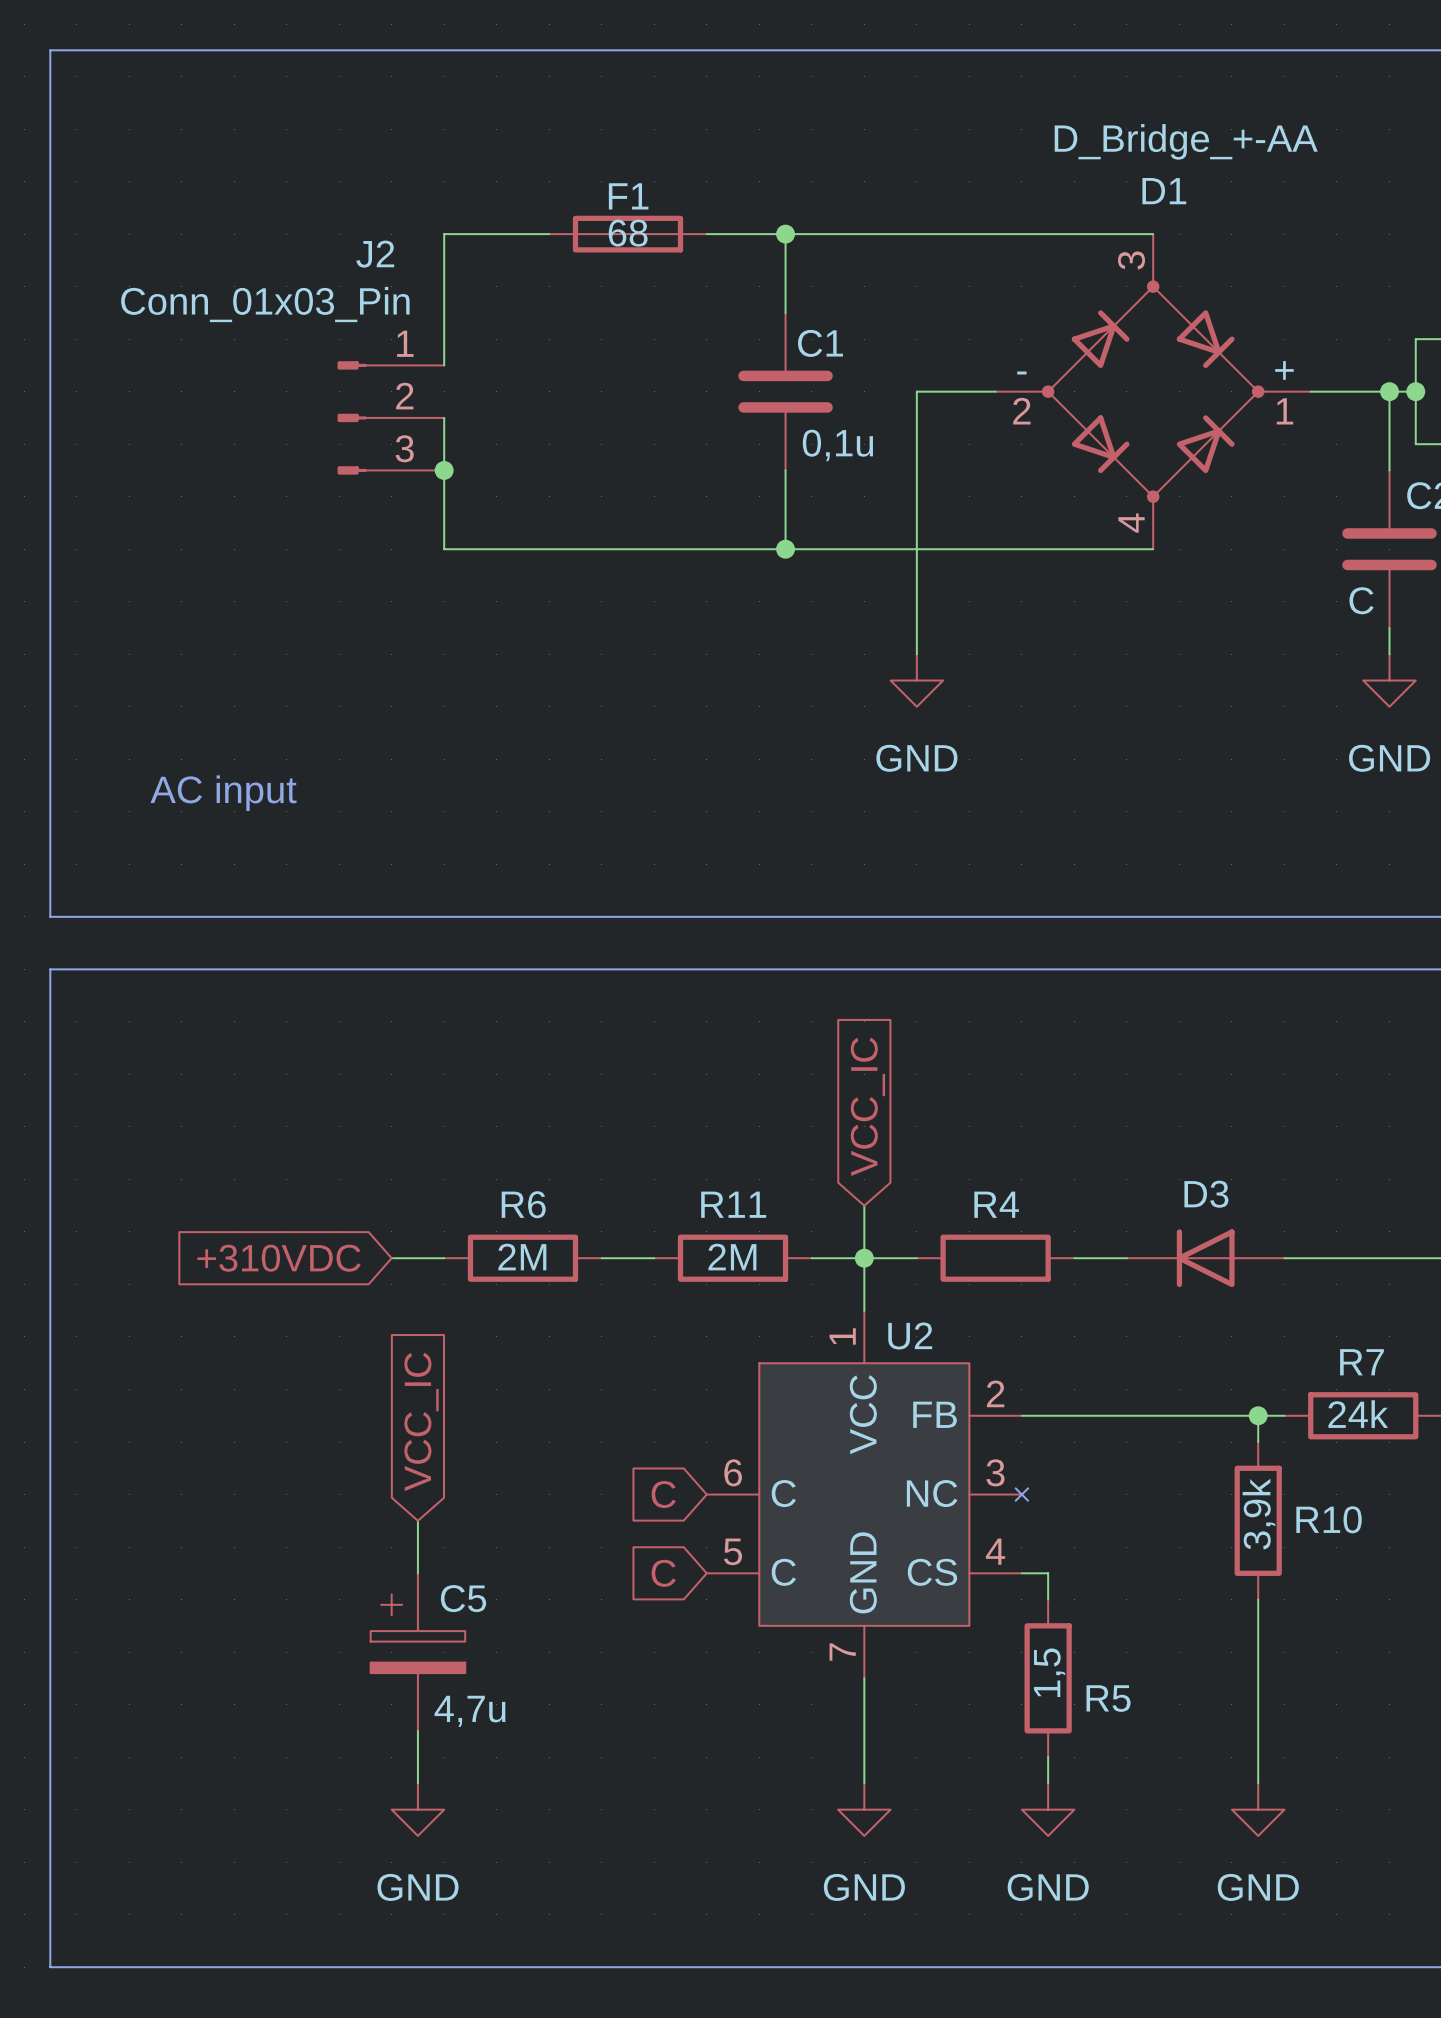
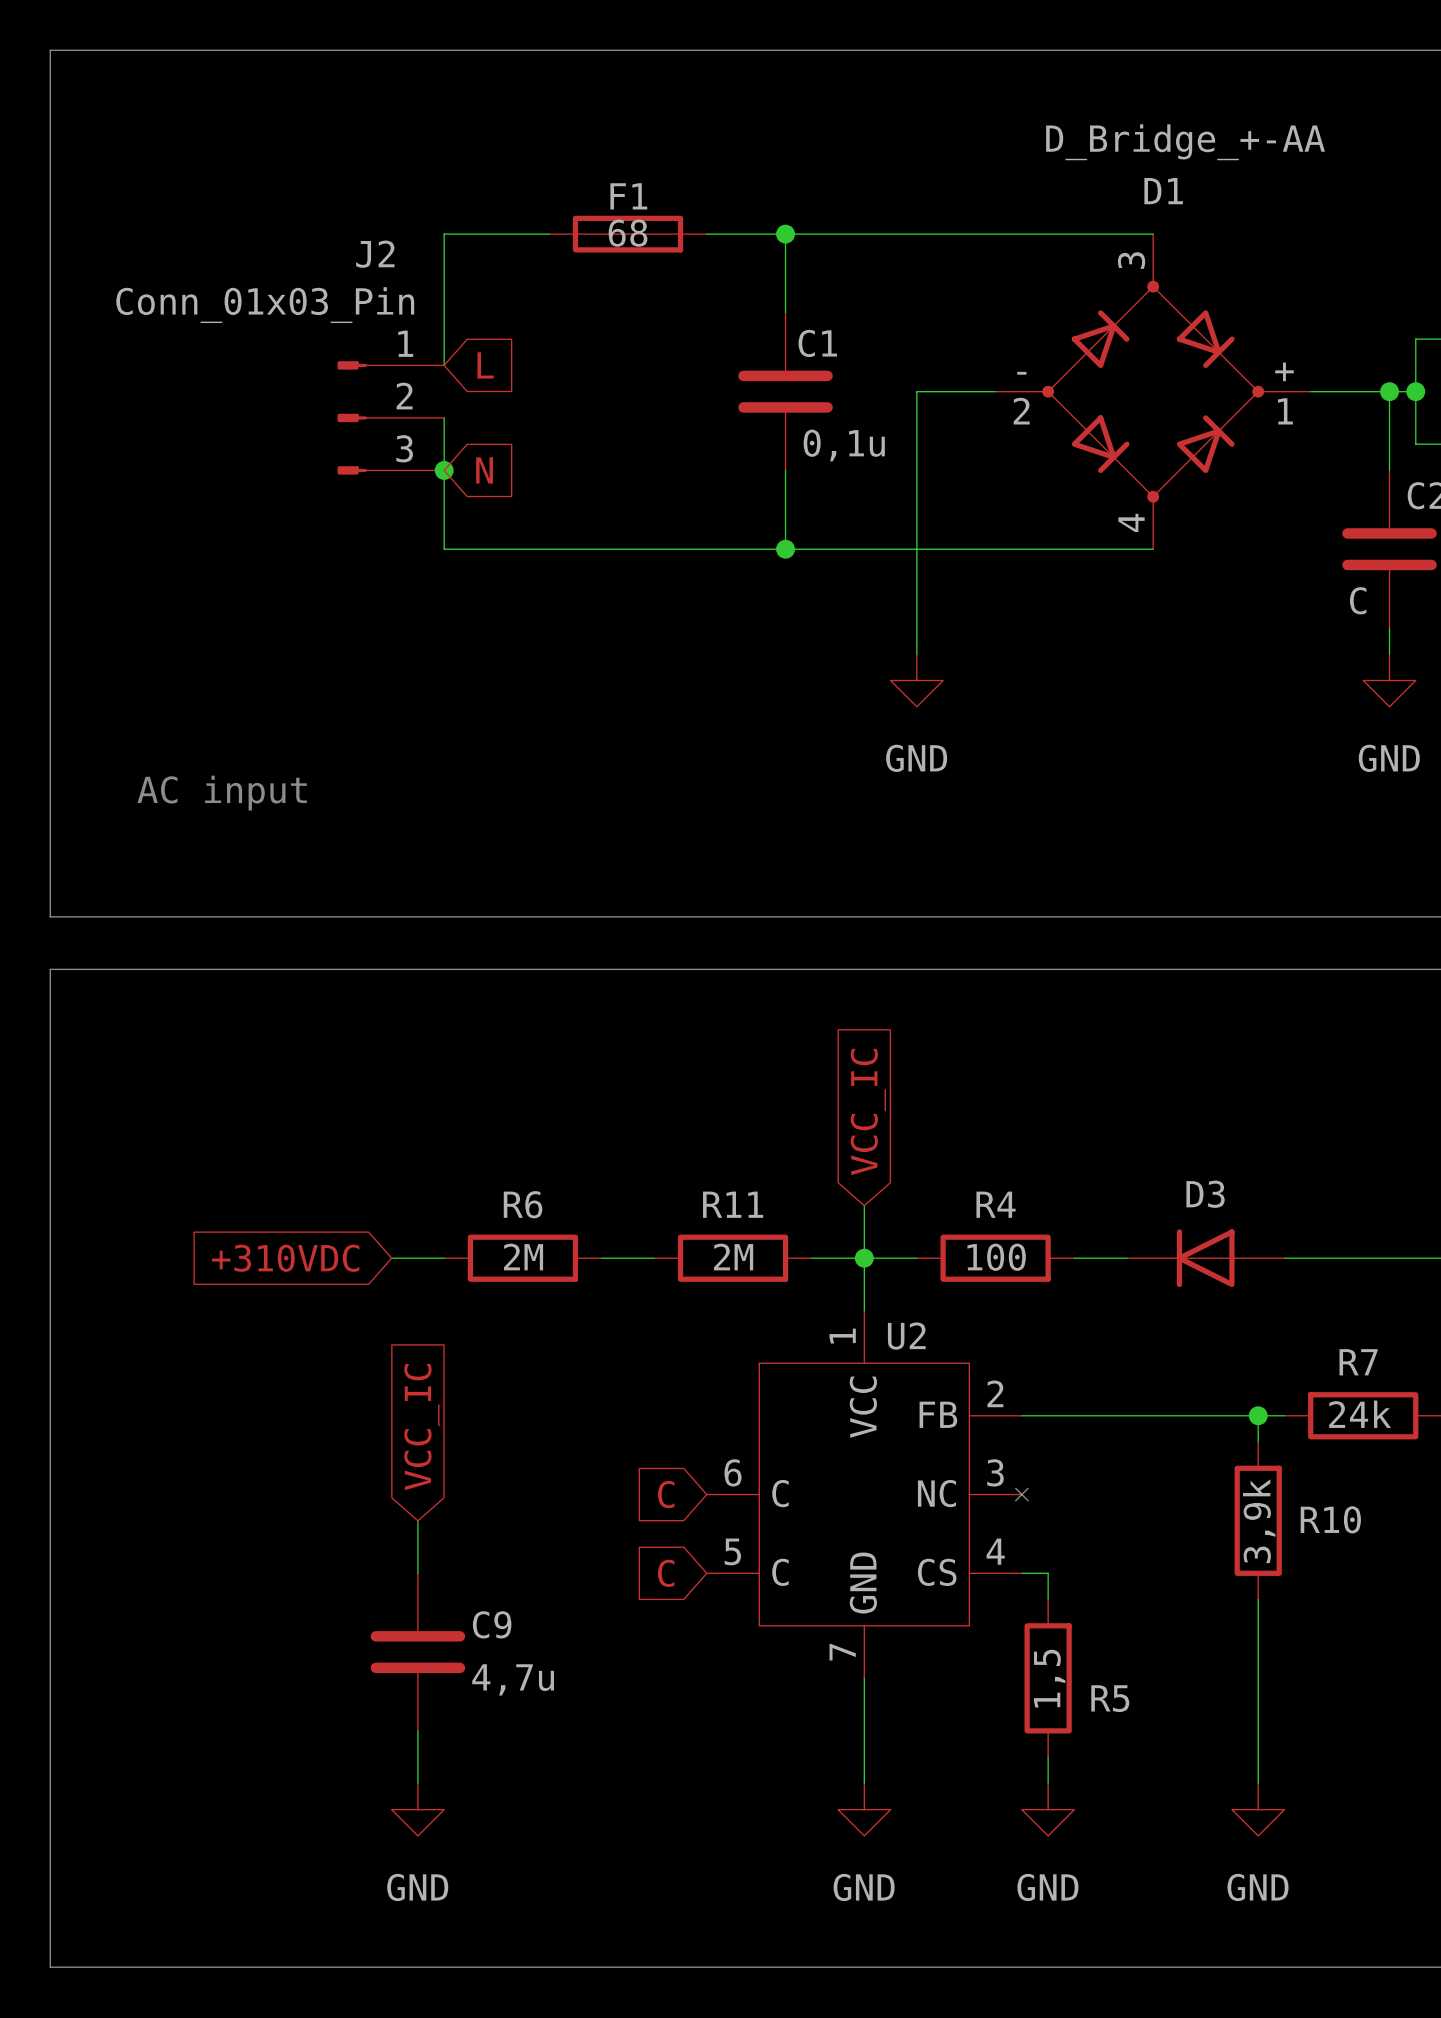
global label: none -> L (485, 365)
global label: none -> N (484, 470)
R4 value: none -> 100 (996, 1257)
C5: 4,7u (417, 1652) -> none
C9: none -> 4,7u (417, 1652)

